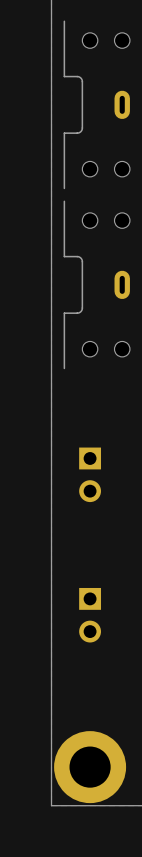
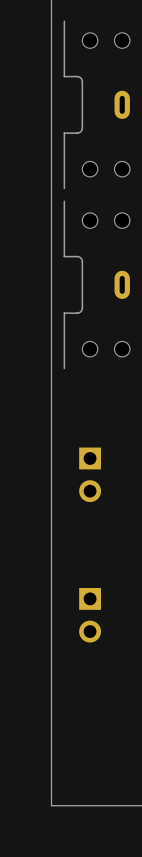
part: (90, 767) -> none

